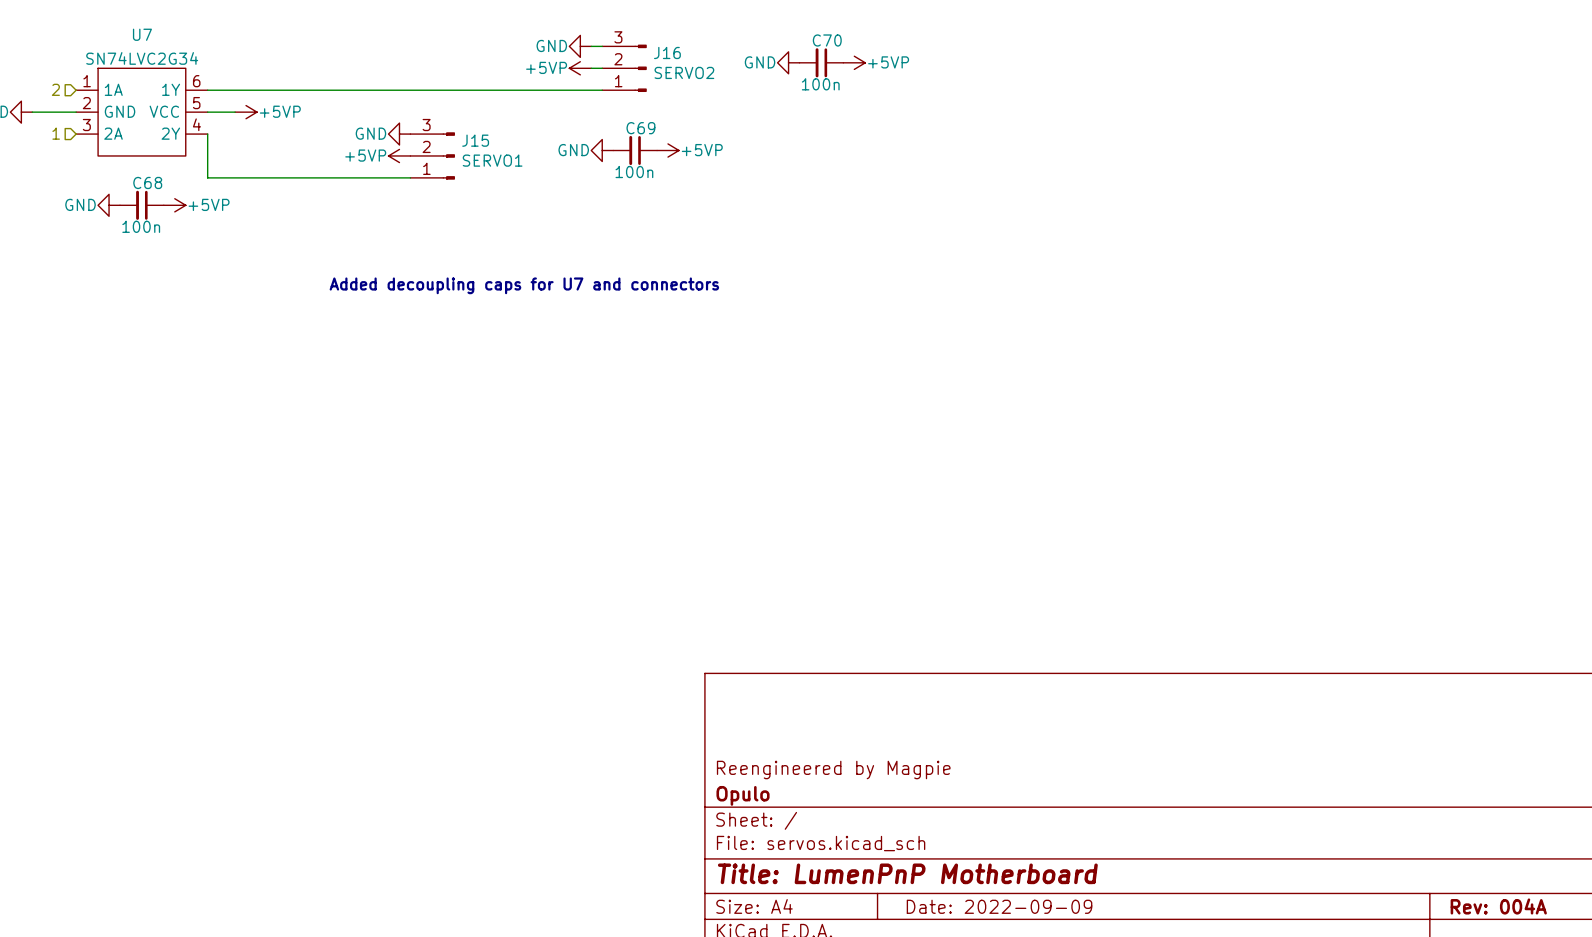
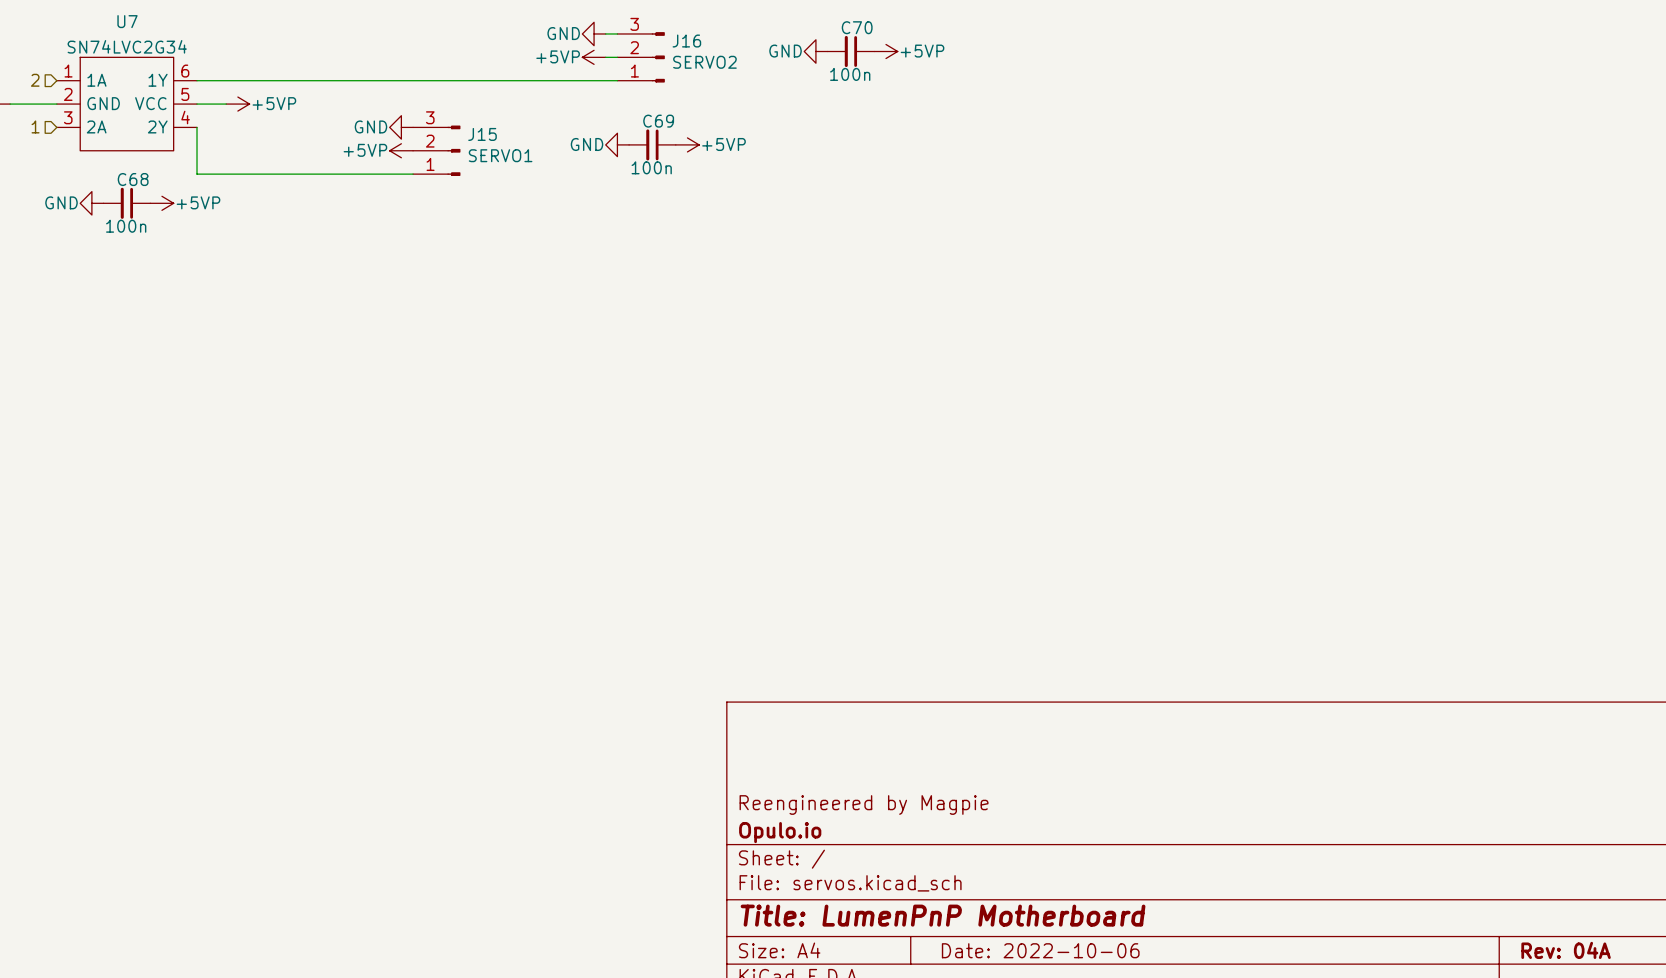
text: Added decoupling caps for U7 and connectors (524, 285) -> none
title block: Opulo (743, 795) -> Opulo.io (780, 832)
title block: Date: 2022-09-09 (999, 906) -> Date: 2022-10-06 (1040, 950)
title block: Rev: 004A (1498, 906) -> Rev: 04A (1566, 950)

